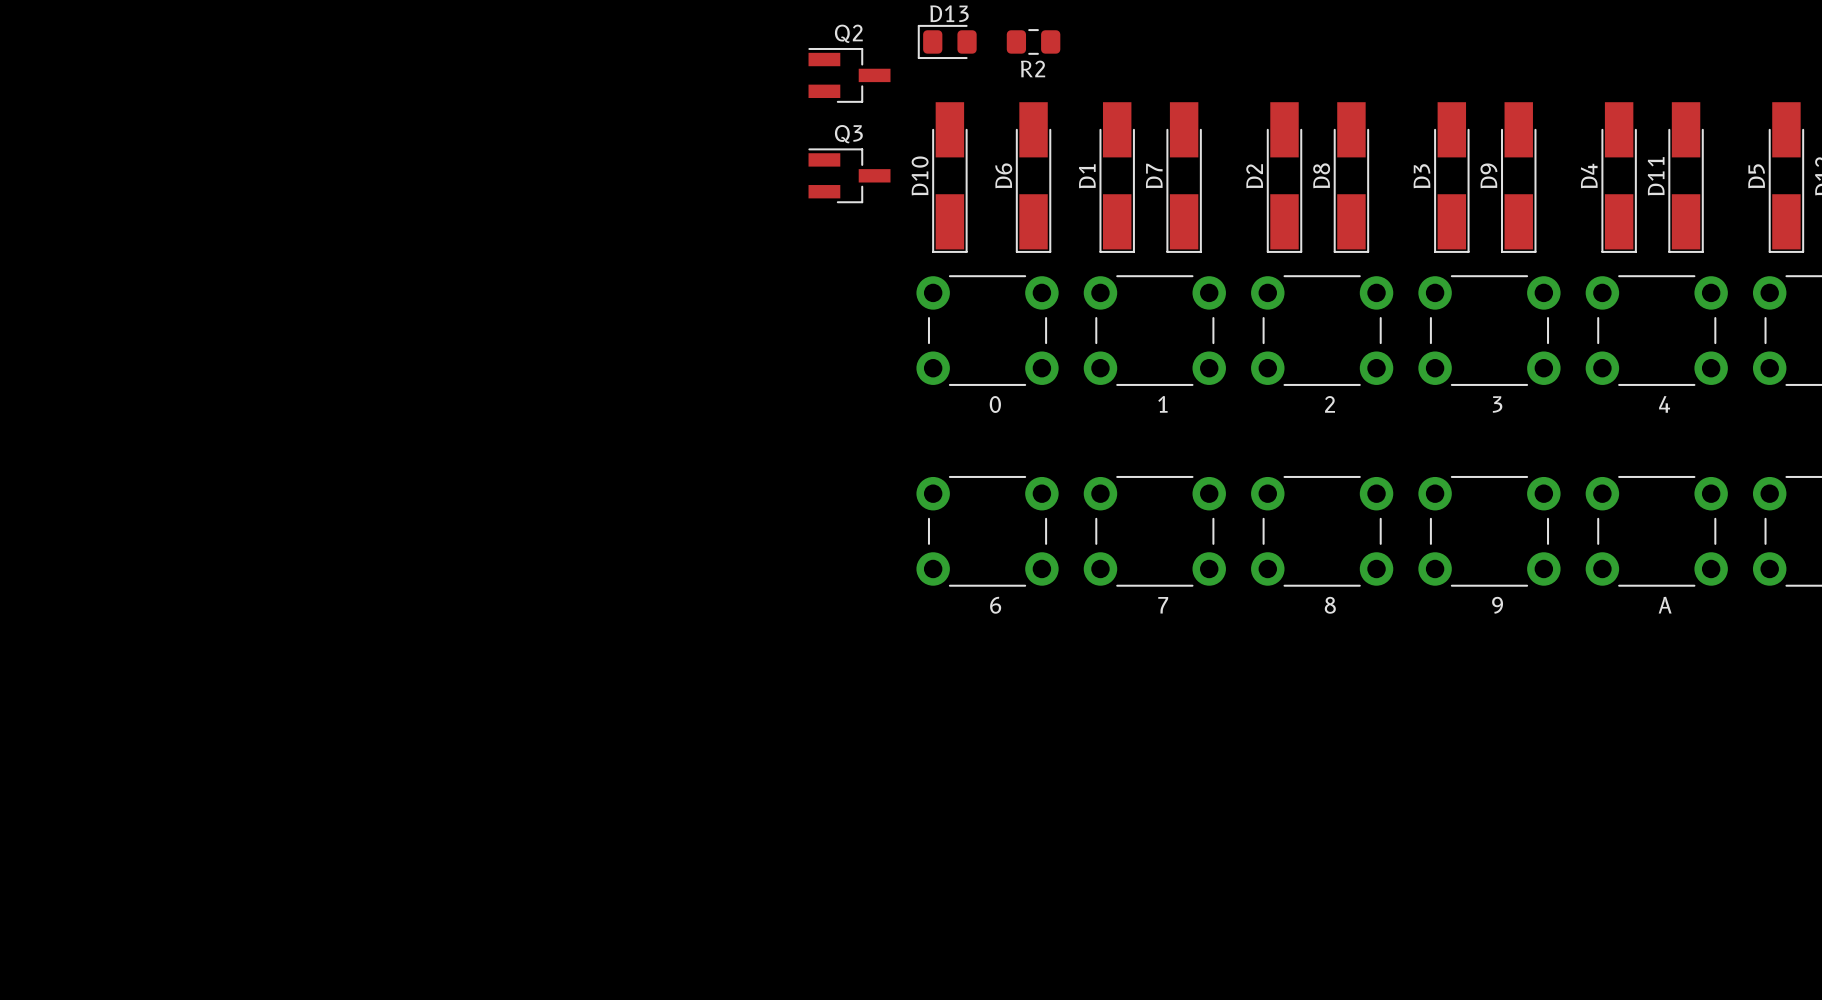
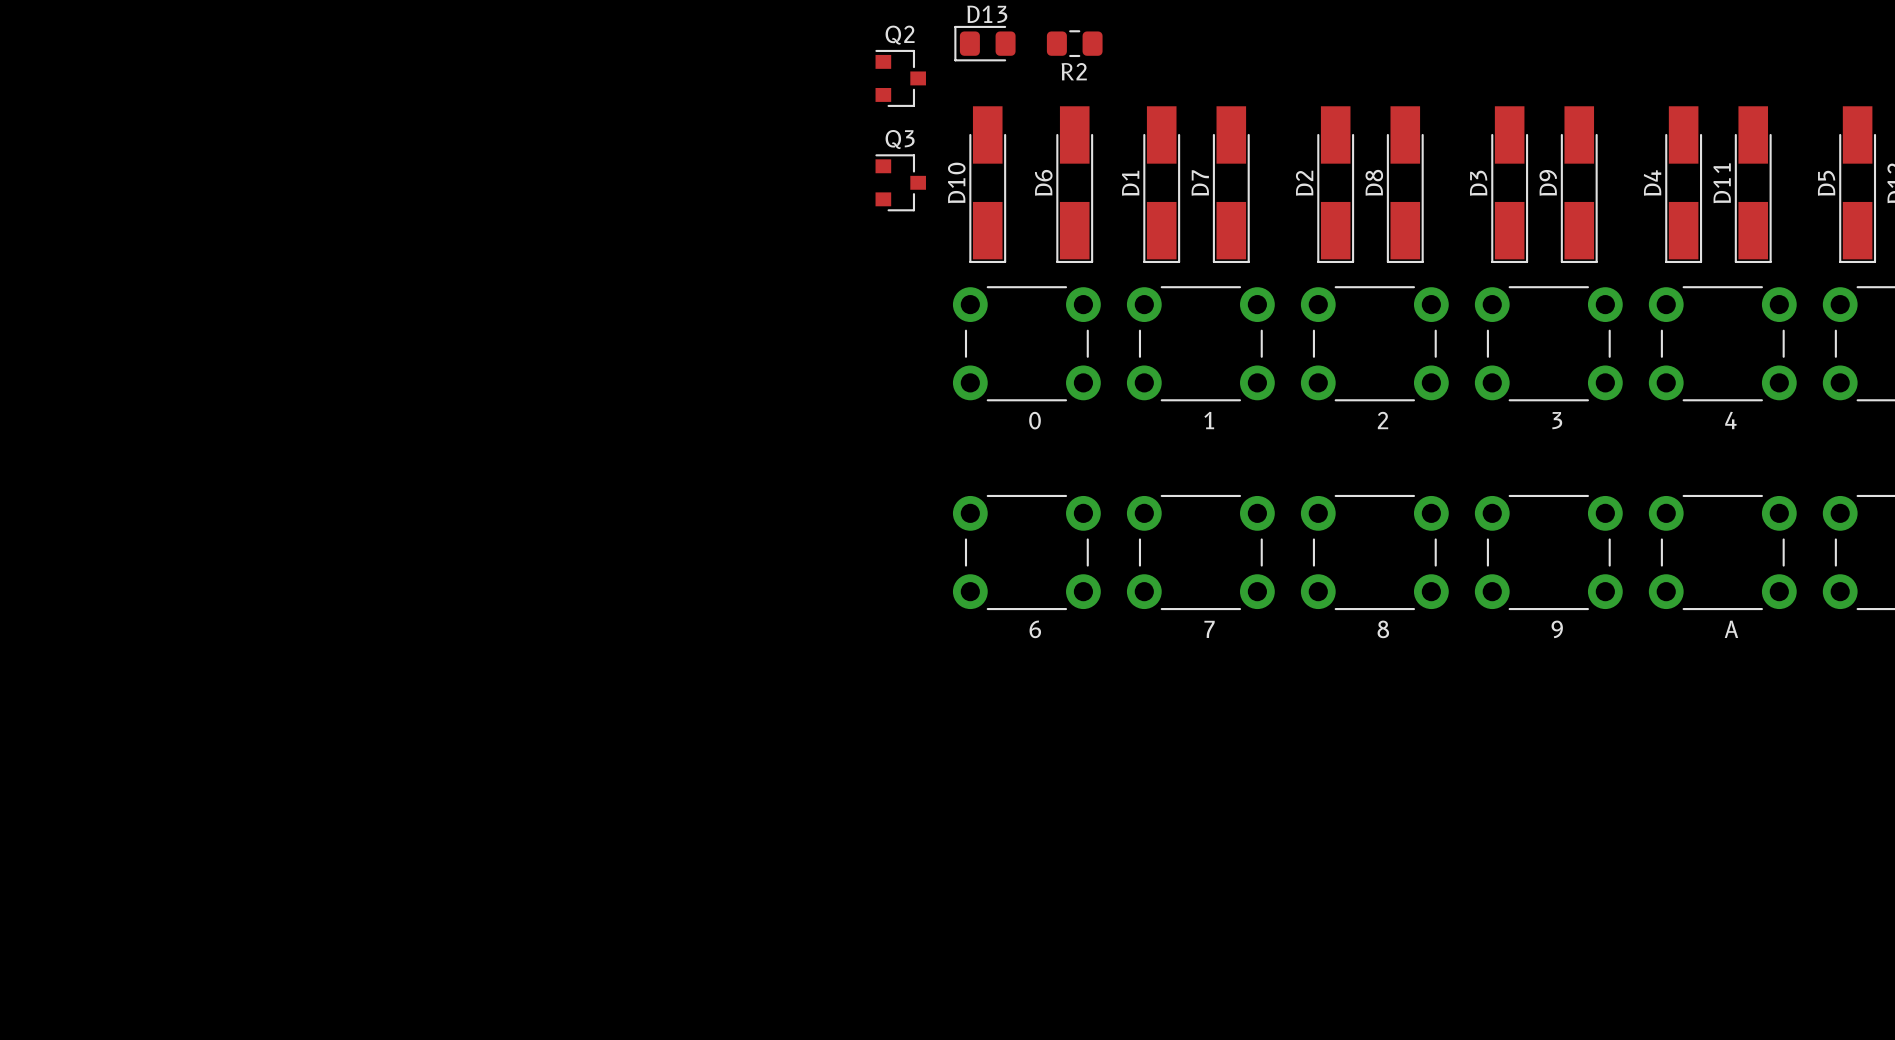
Q2 footprint: [808, 47, 891, 103] -> [875, 49, 926, 107]
Q3 footprint: [808, 148, 891, 204] -> [875, 154, 926, 212]

